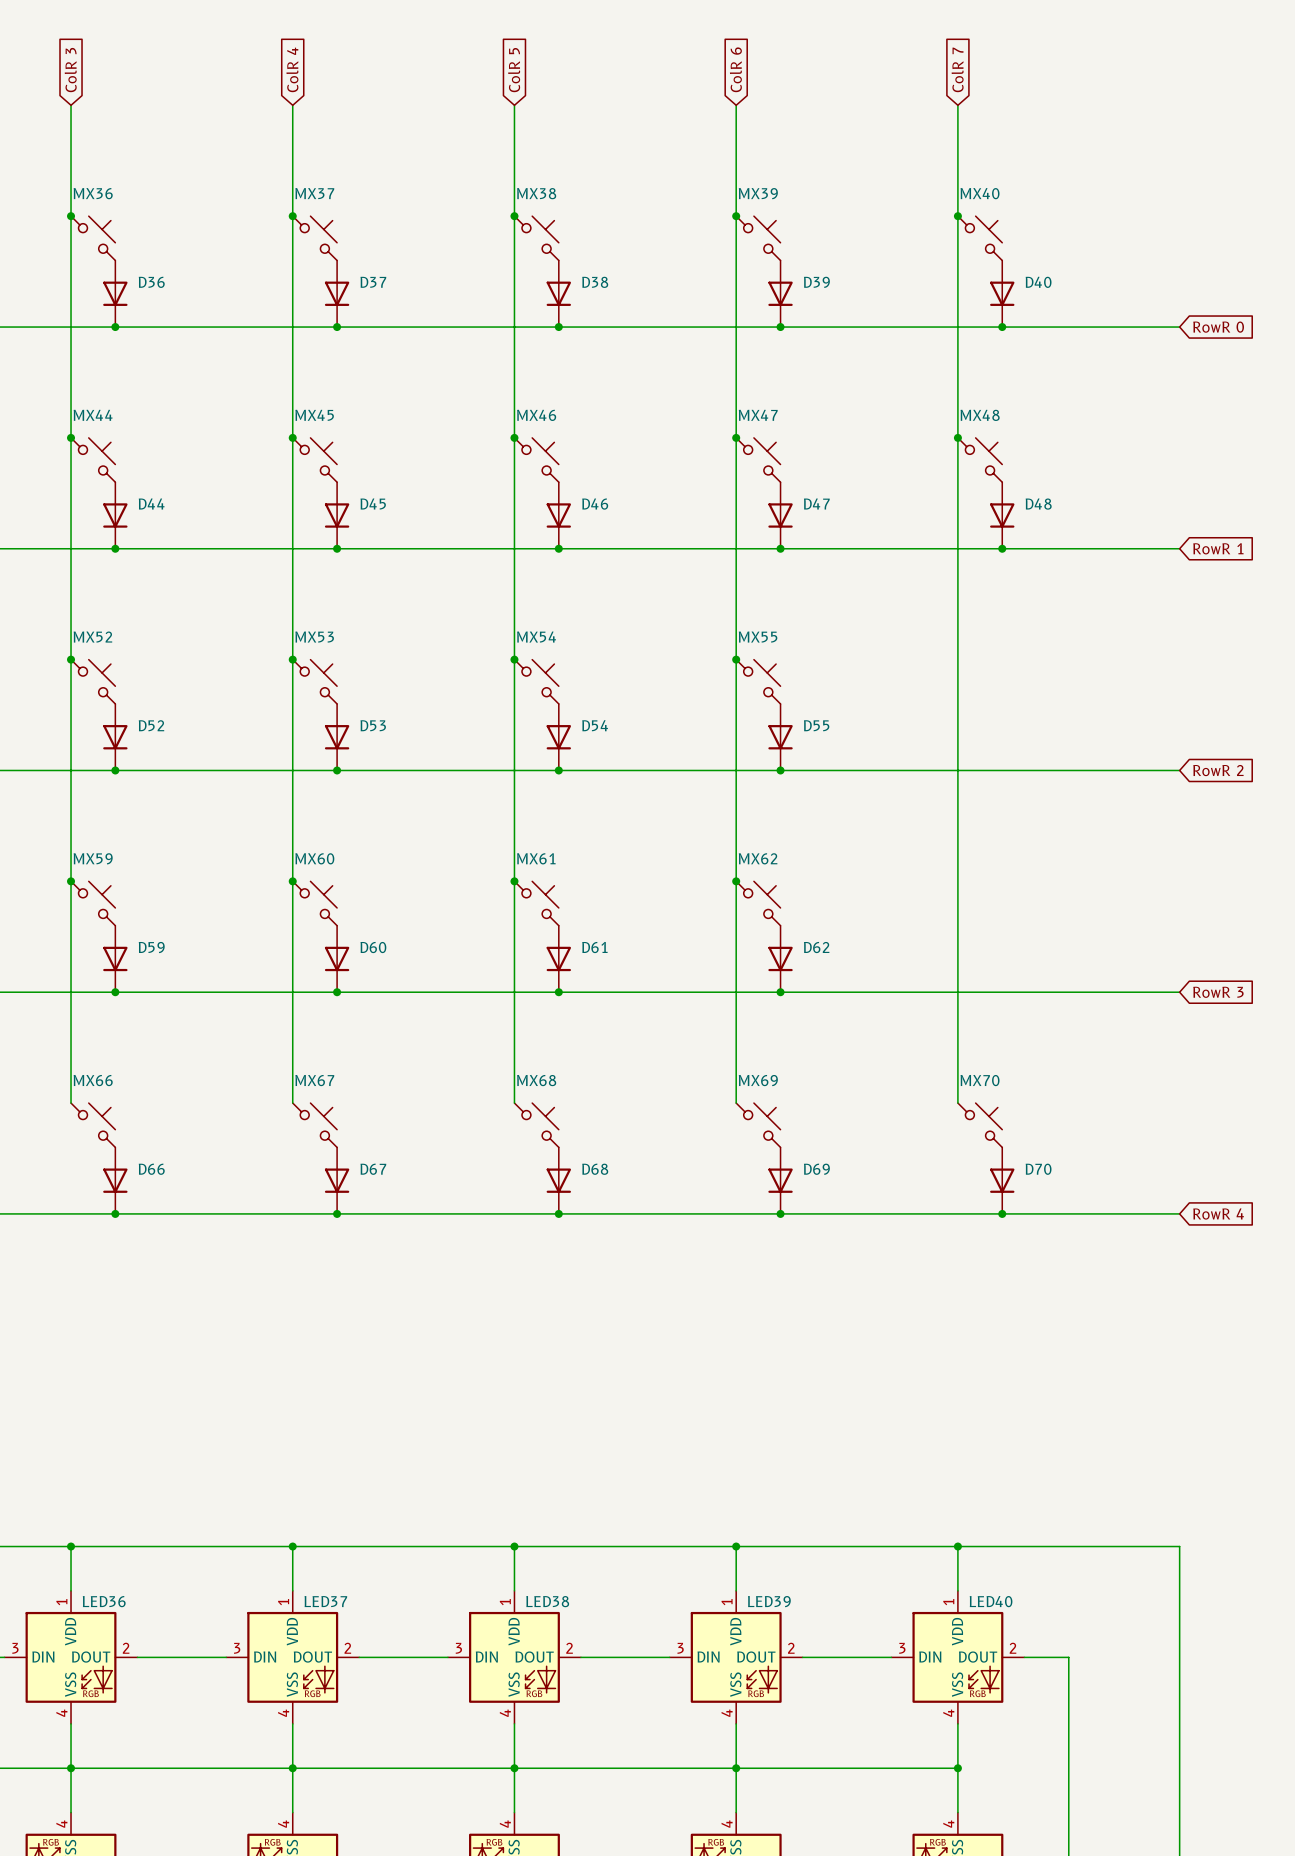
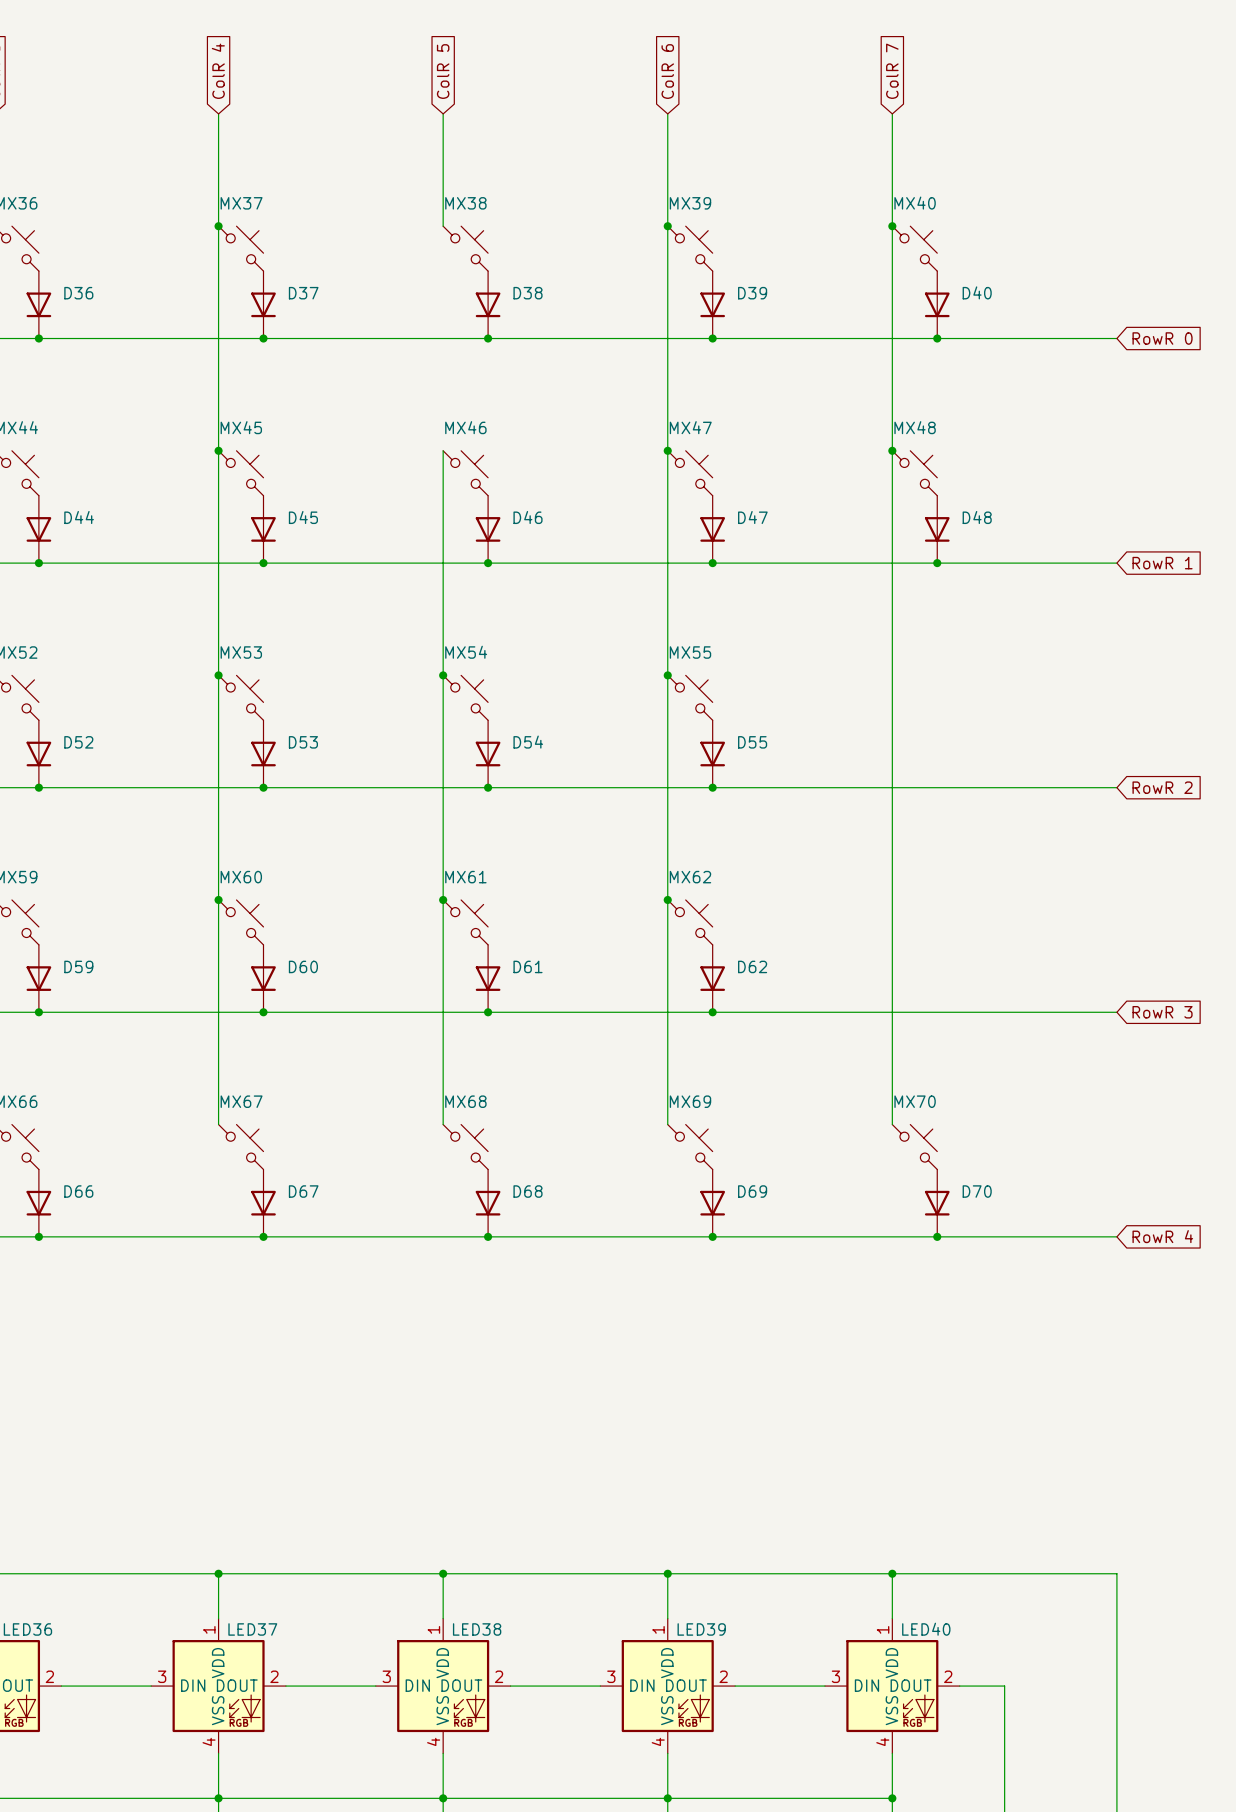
wire: (514, 216) (514, 437) -> none
junction: (514, 216) -> none
junction: (514, 437) -> none

